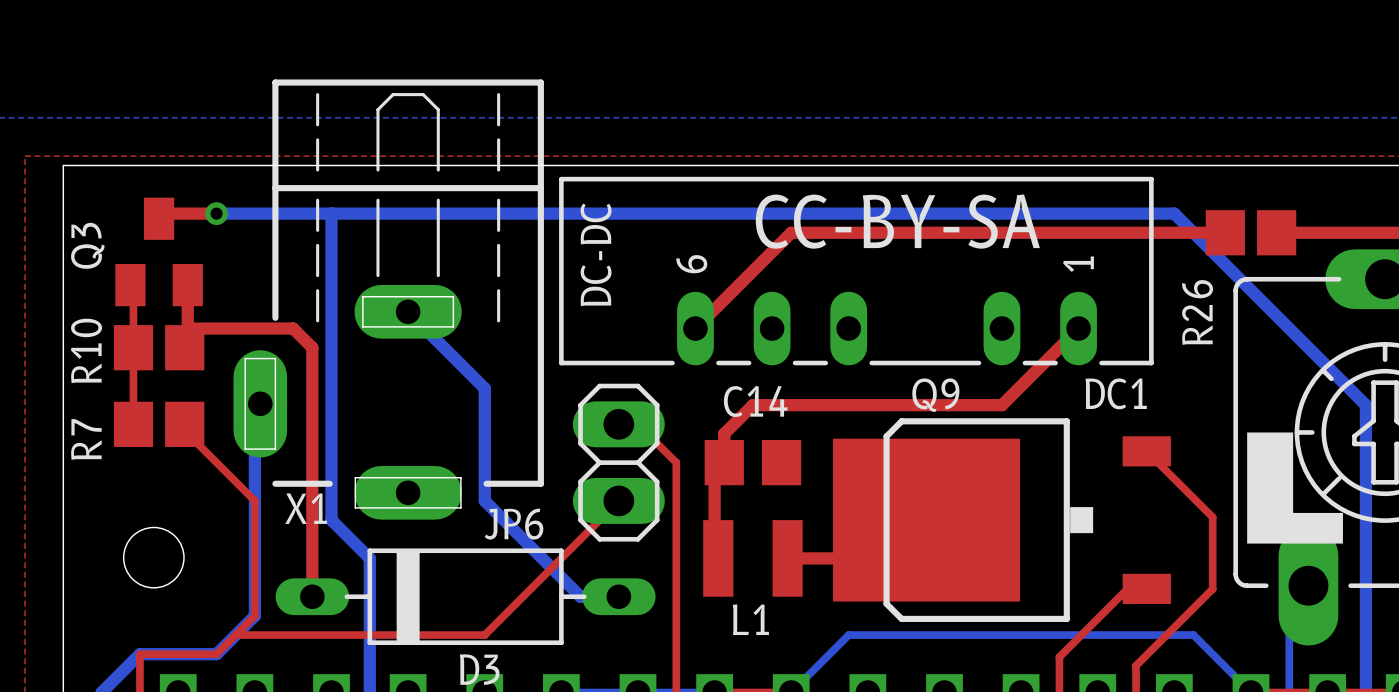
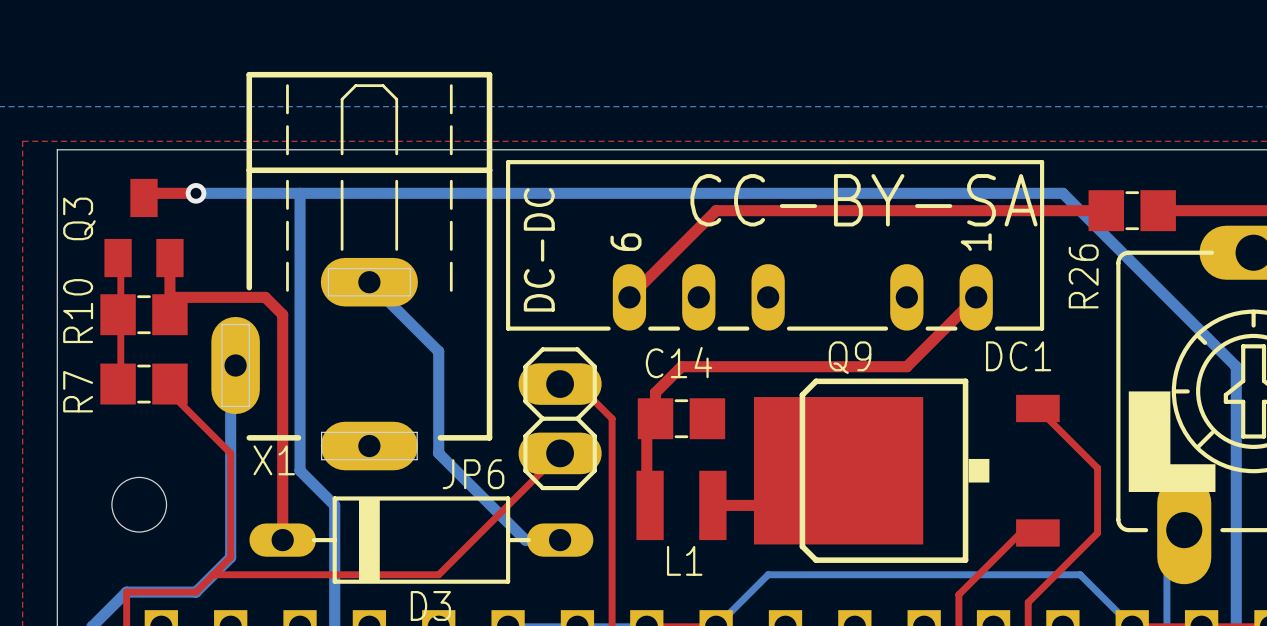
R26 footprint: [1205, 210, 1297, 256] -> [1088, 190, 1176, 232]
R10 footprint: [113, 325, 205, 371] -> [100, 294, 188, 336]
R7 footprint: [113, 401, 205, 447] -> [100, 363, 188, 405]
C14 footprint: [704, 440, 802, 486] -> [637, 398, 726, 440]

